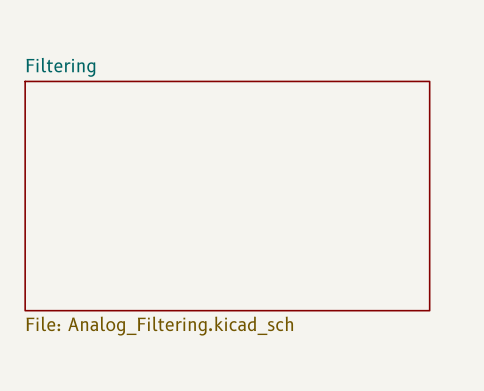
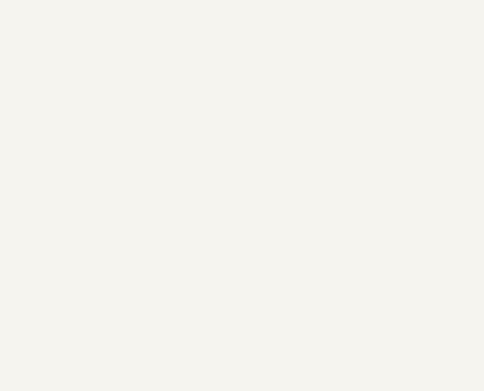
sheet Filtering: File: Analog_Filtering.kicad_sch (227, 196) -> none

